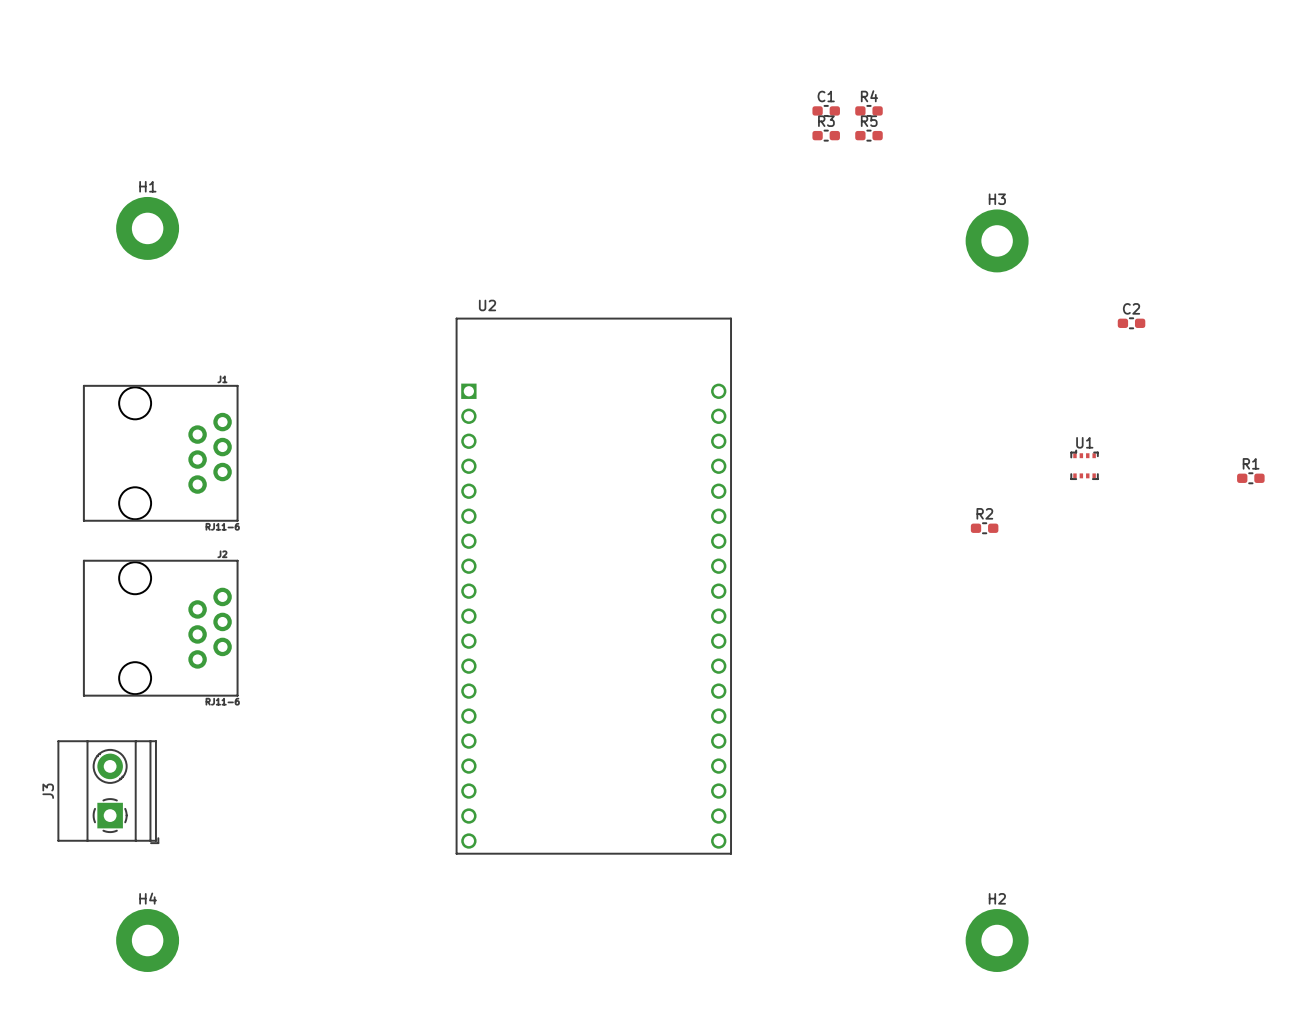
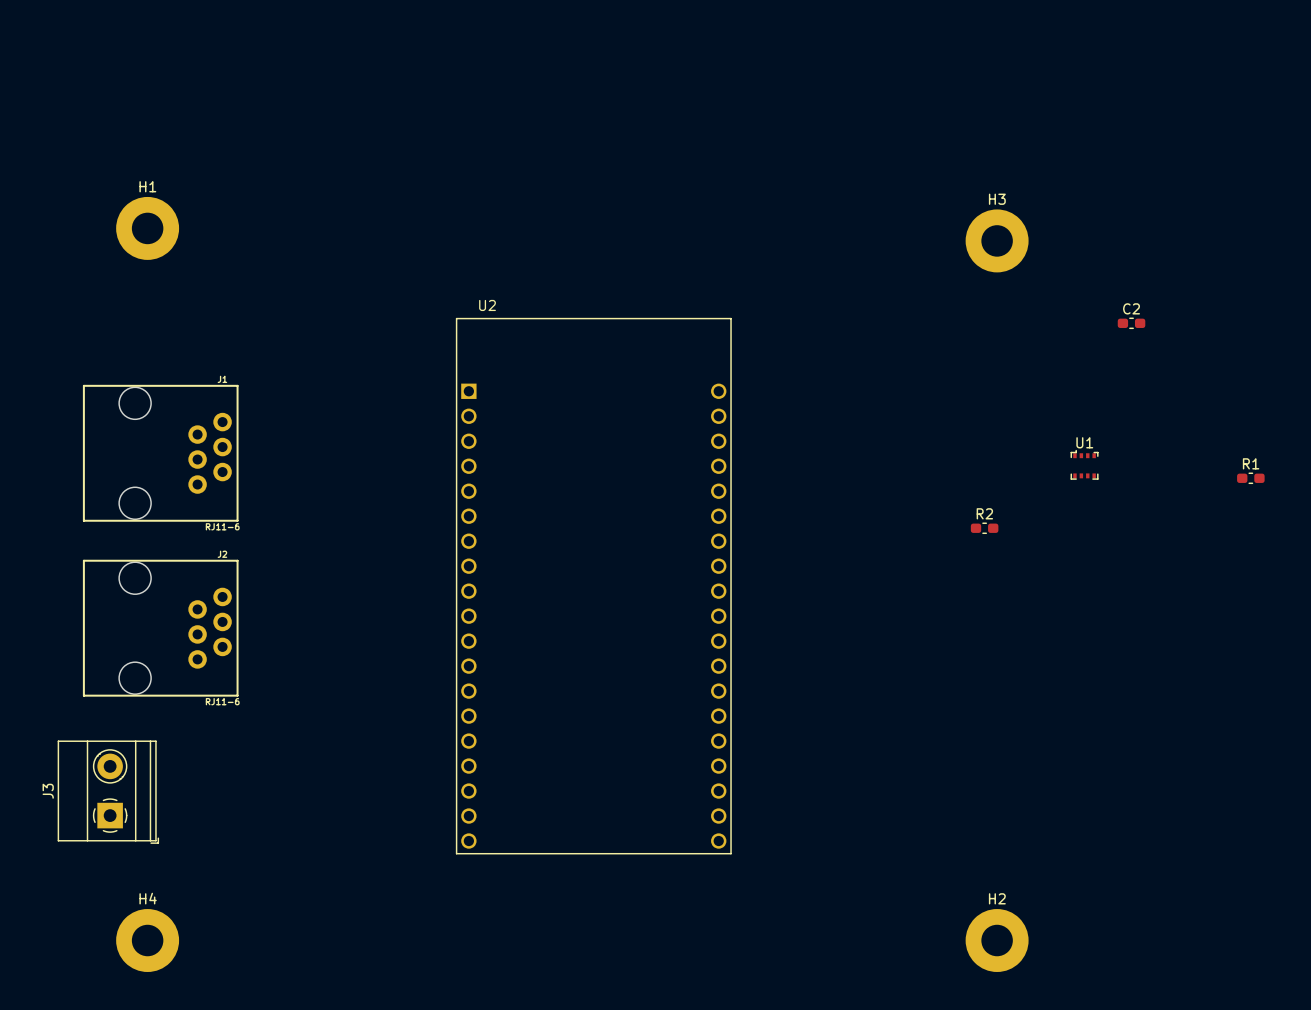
C1: (826, 110) -> none
R4: (868, 110) -> none
R3: (826, 135) -> none
R5: (868, 135) -> none

